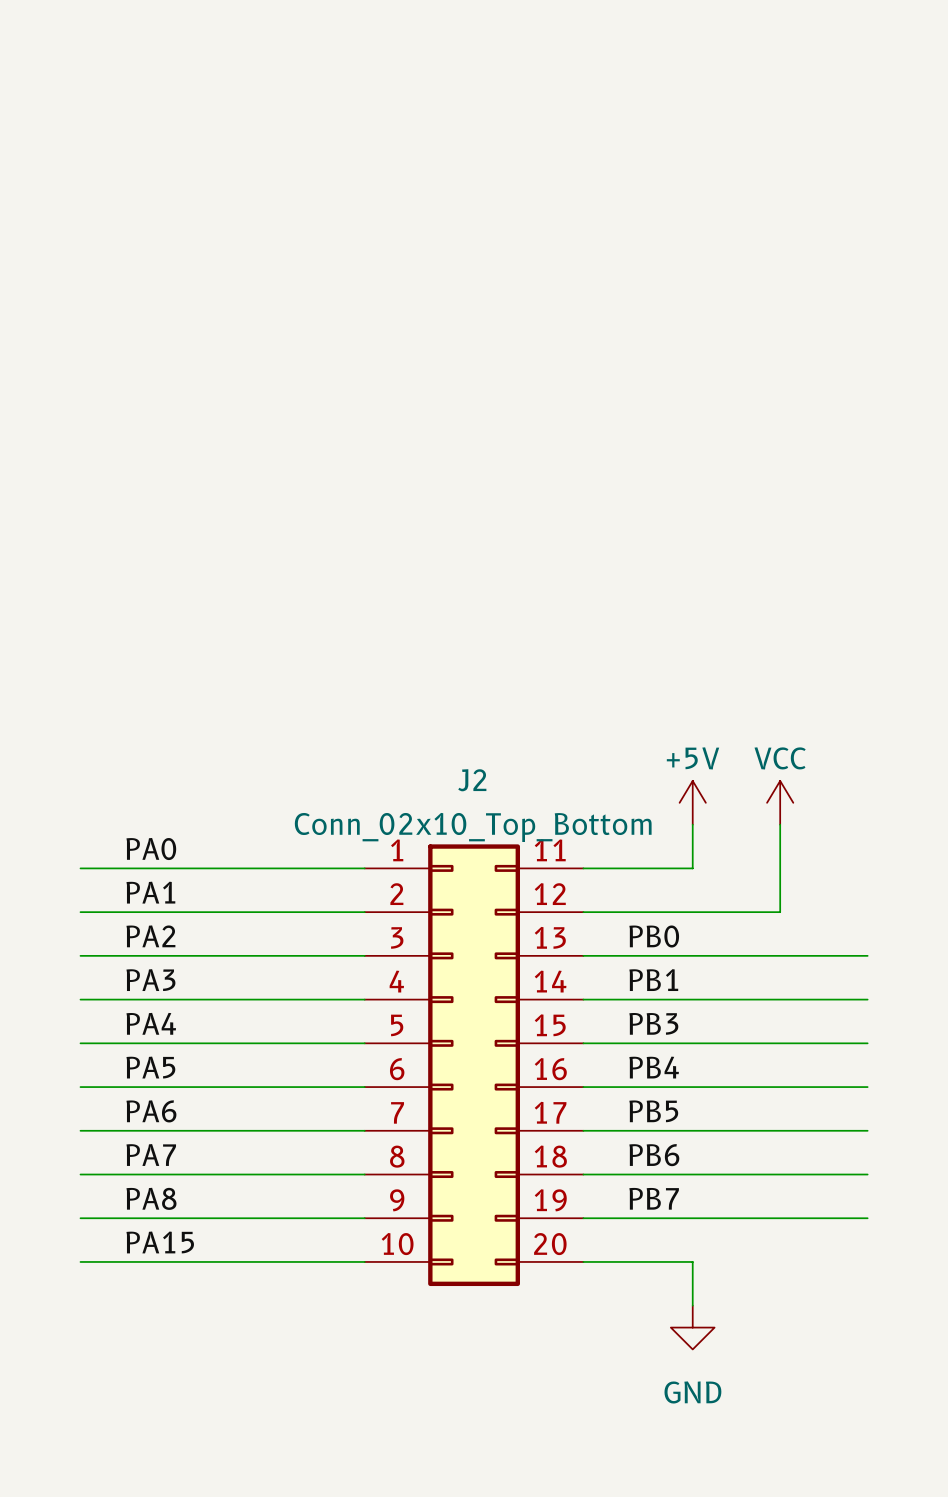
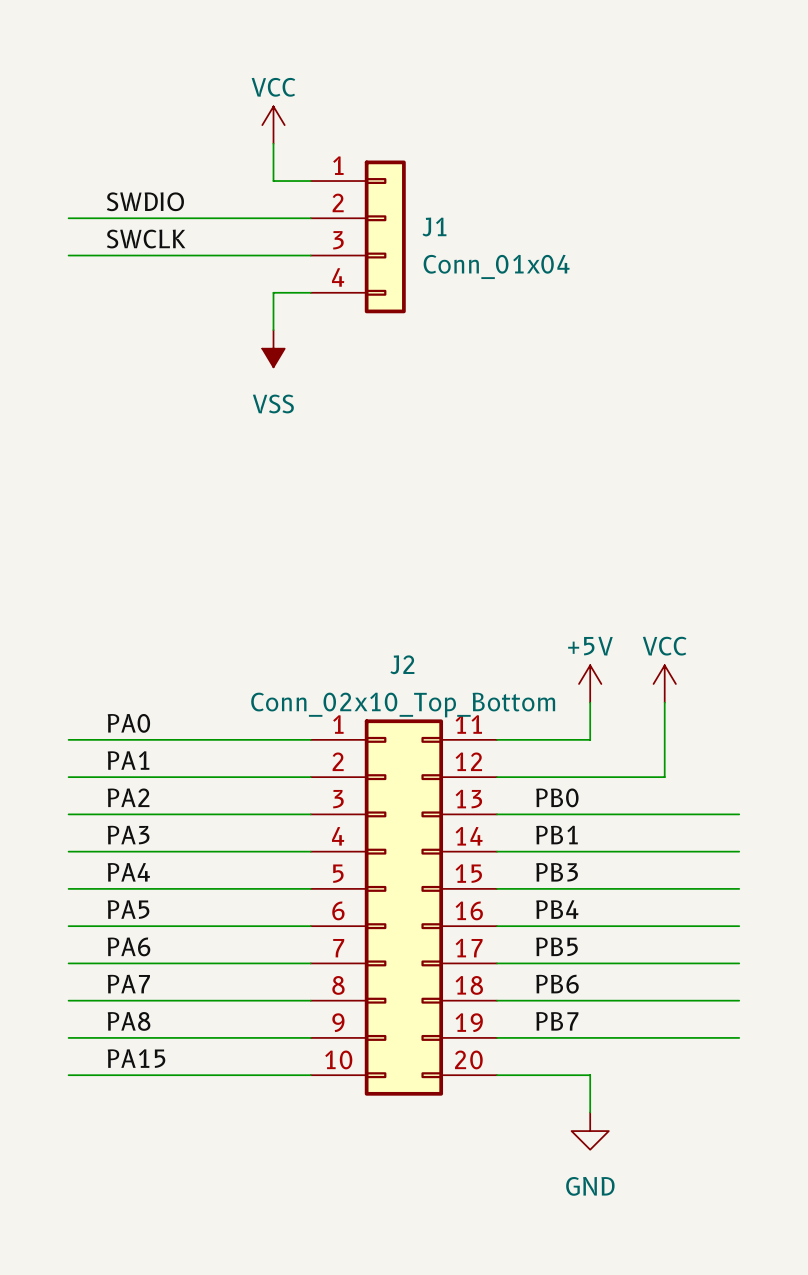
power symbol: none -> VCC (273, 125)
wire: none -> (273, 143) (273, 181) (310, 181)
label: none -> SWDIO (145, 201)
wire: none -> (68, 218) (310, 218)
J1: none -> Conn_01x04 (358, 236)
label: none -> SWCLK (146, 239)
wire: none -> (68, 255) (310, 255)
wire: none -> (310, 292) (273, 292) (273, 330)
power symbol: none -> VSS (273, 348)

